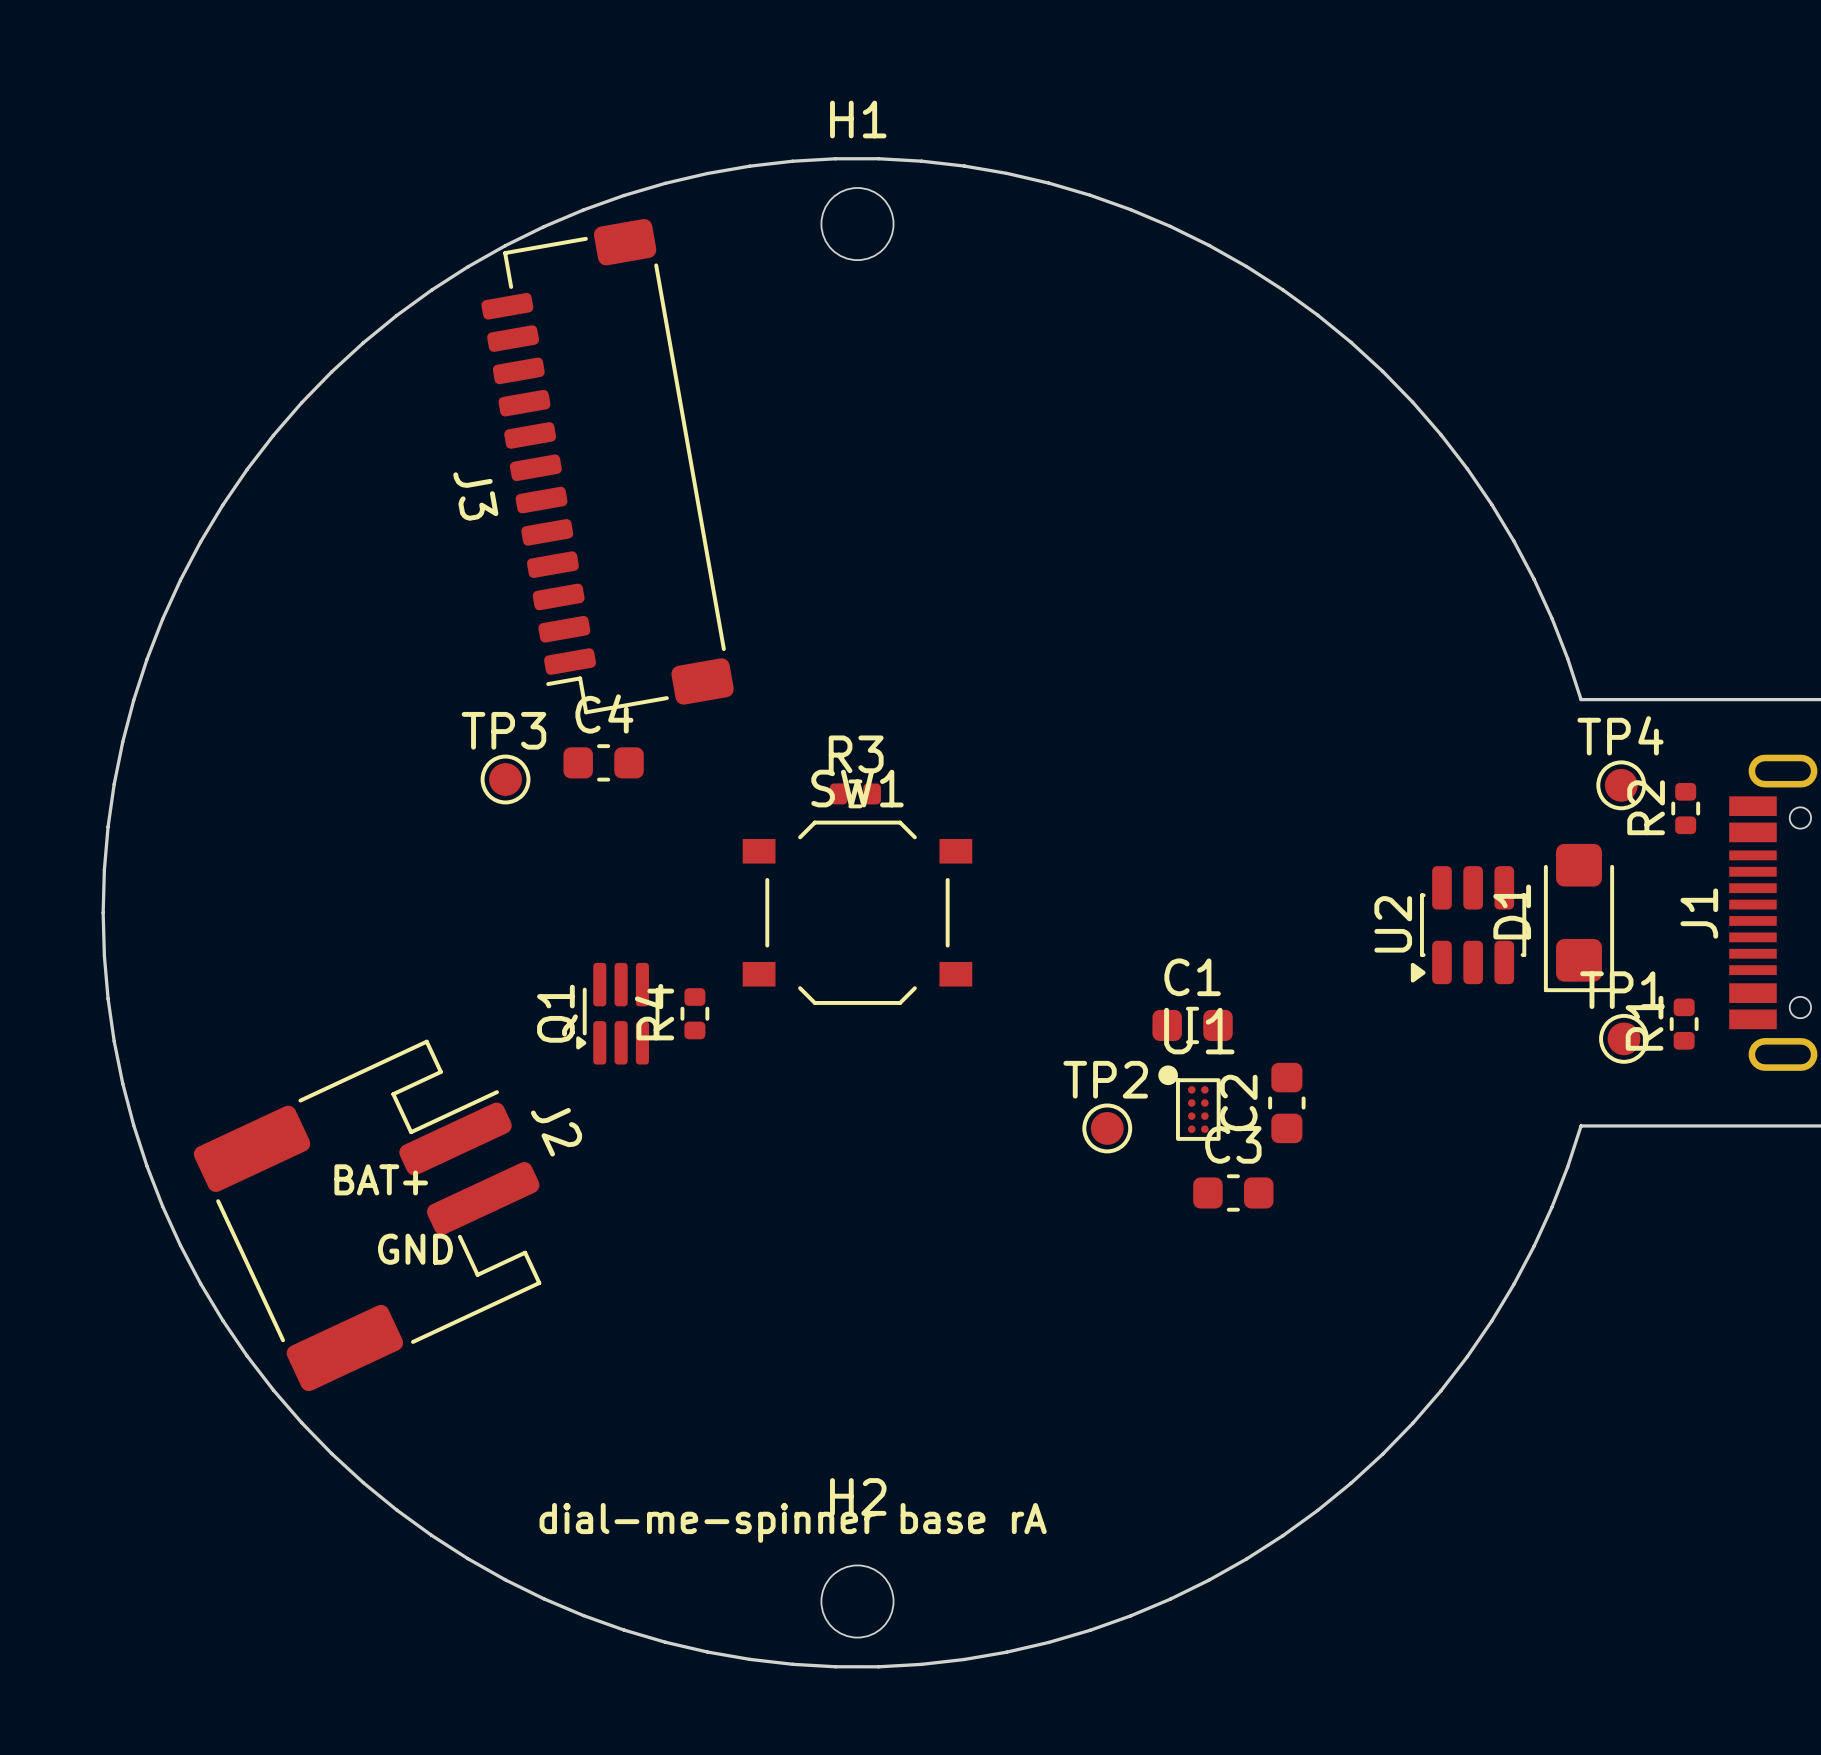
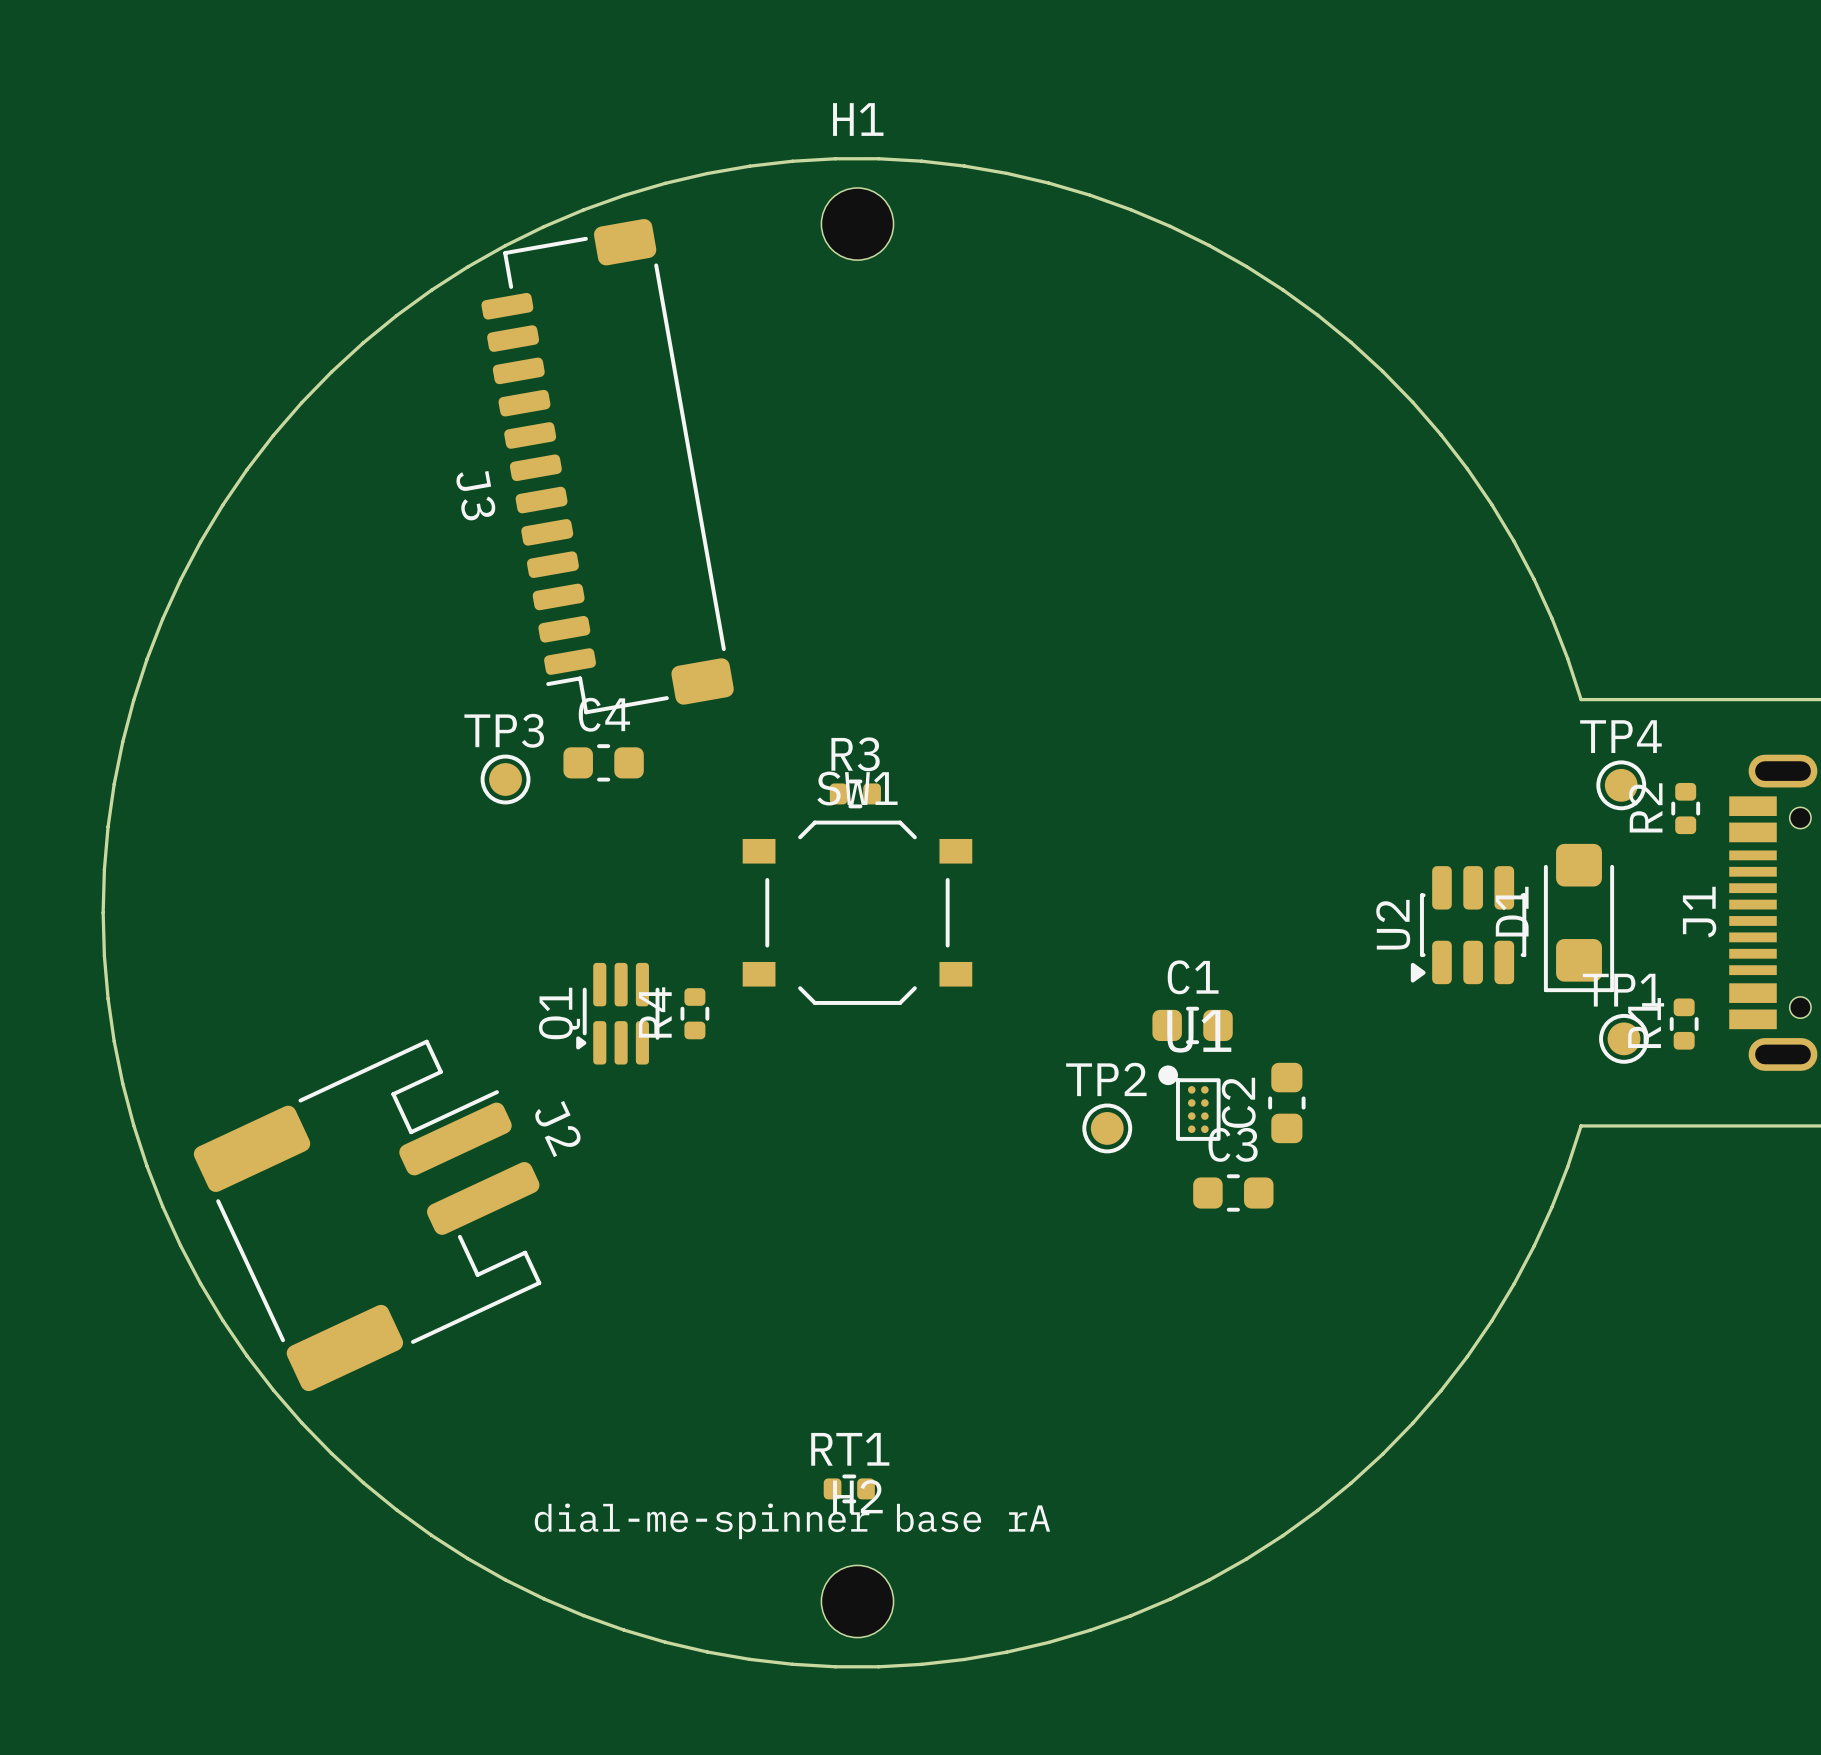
text: BAT+ (381, 1179) -> none
text: GND (415, 1249) -> none
RT1: none -> (849, 1488)

